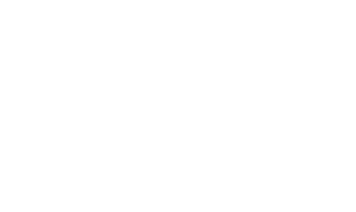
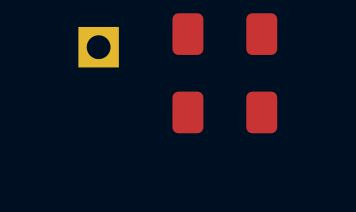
part: none -> (224, 34)
part: none -> (98, 47)
part: none -> (224, 112)

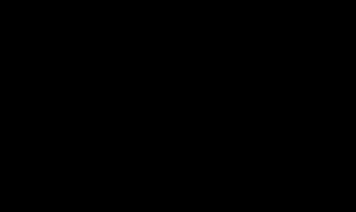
part: (224, 34) -> none
part: (98, 47) -> none
part: (224, 112) -> none

